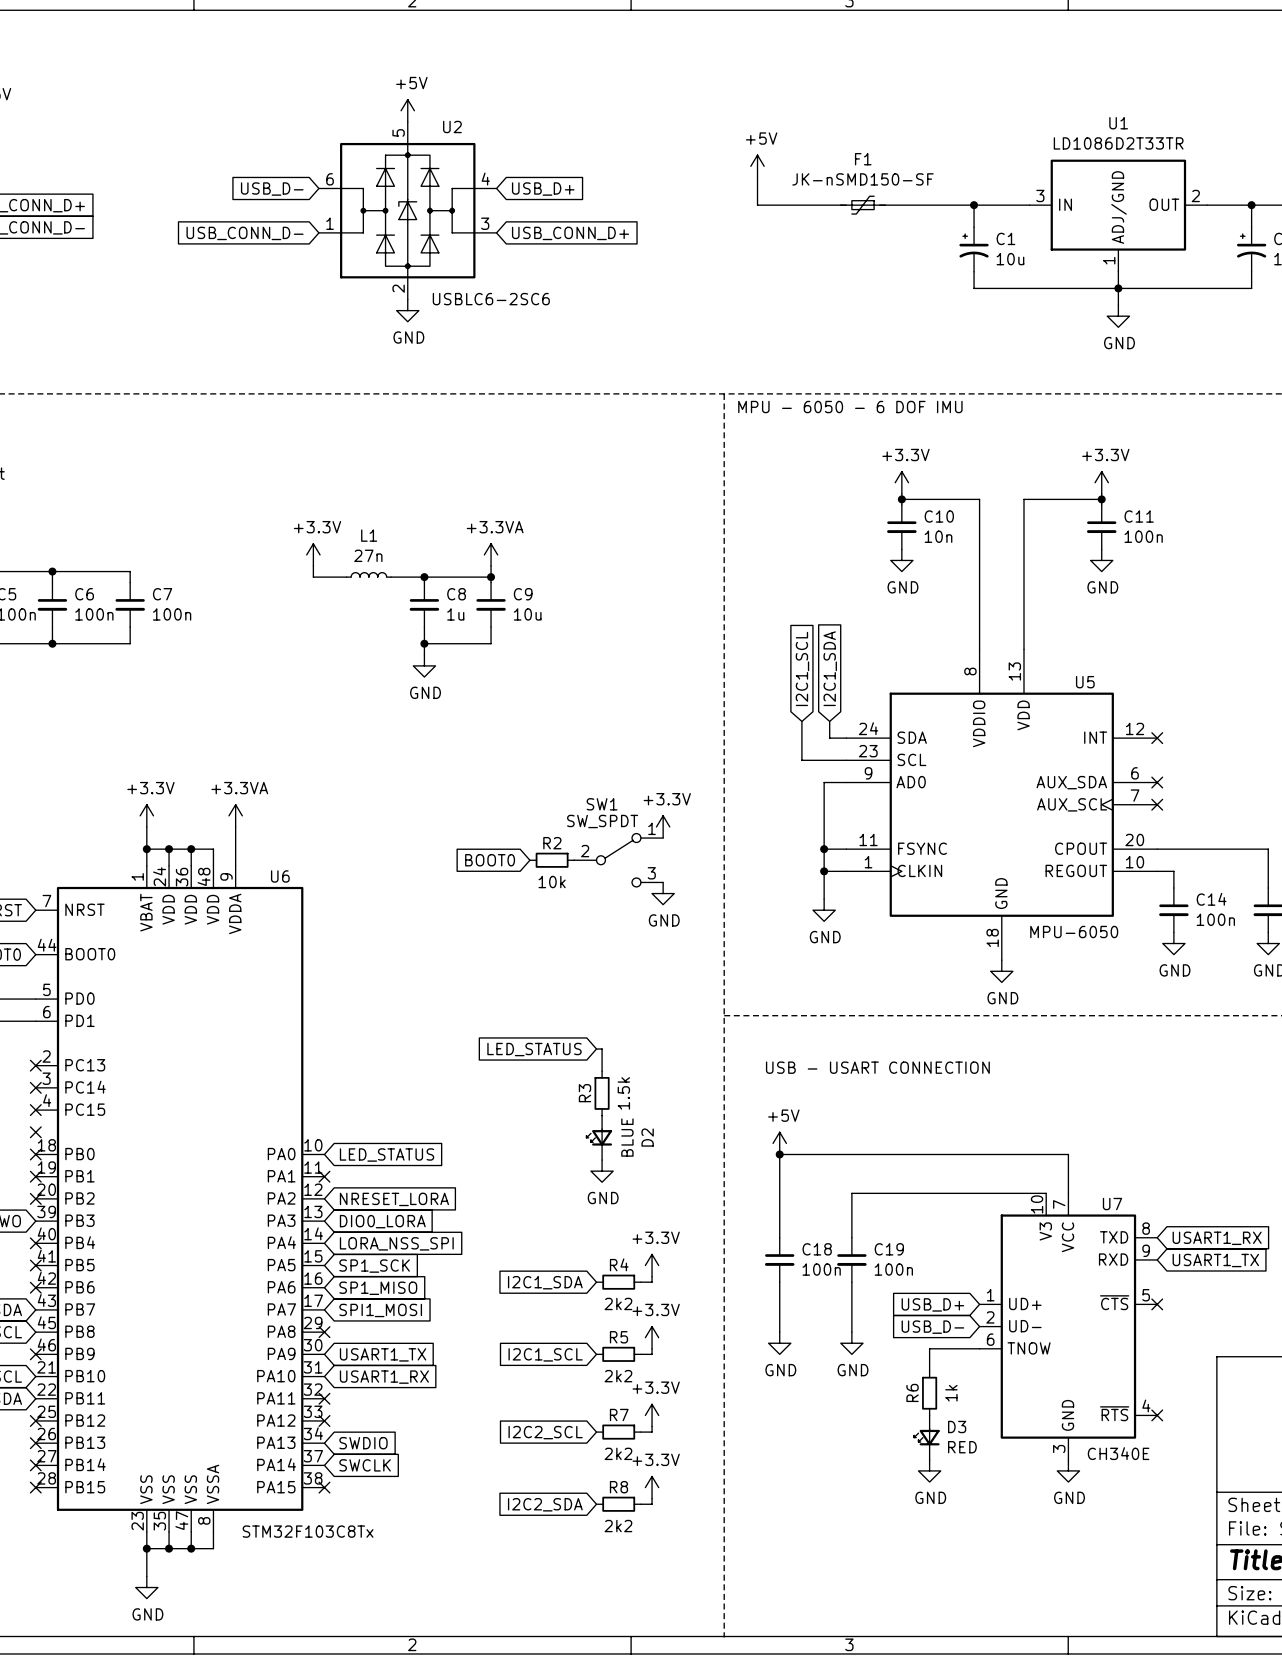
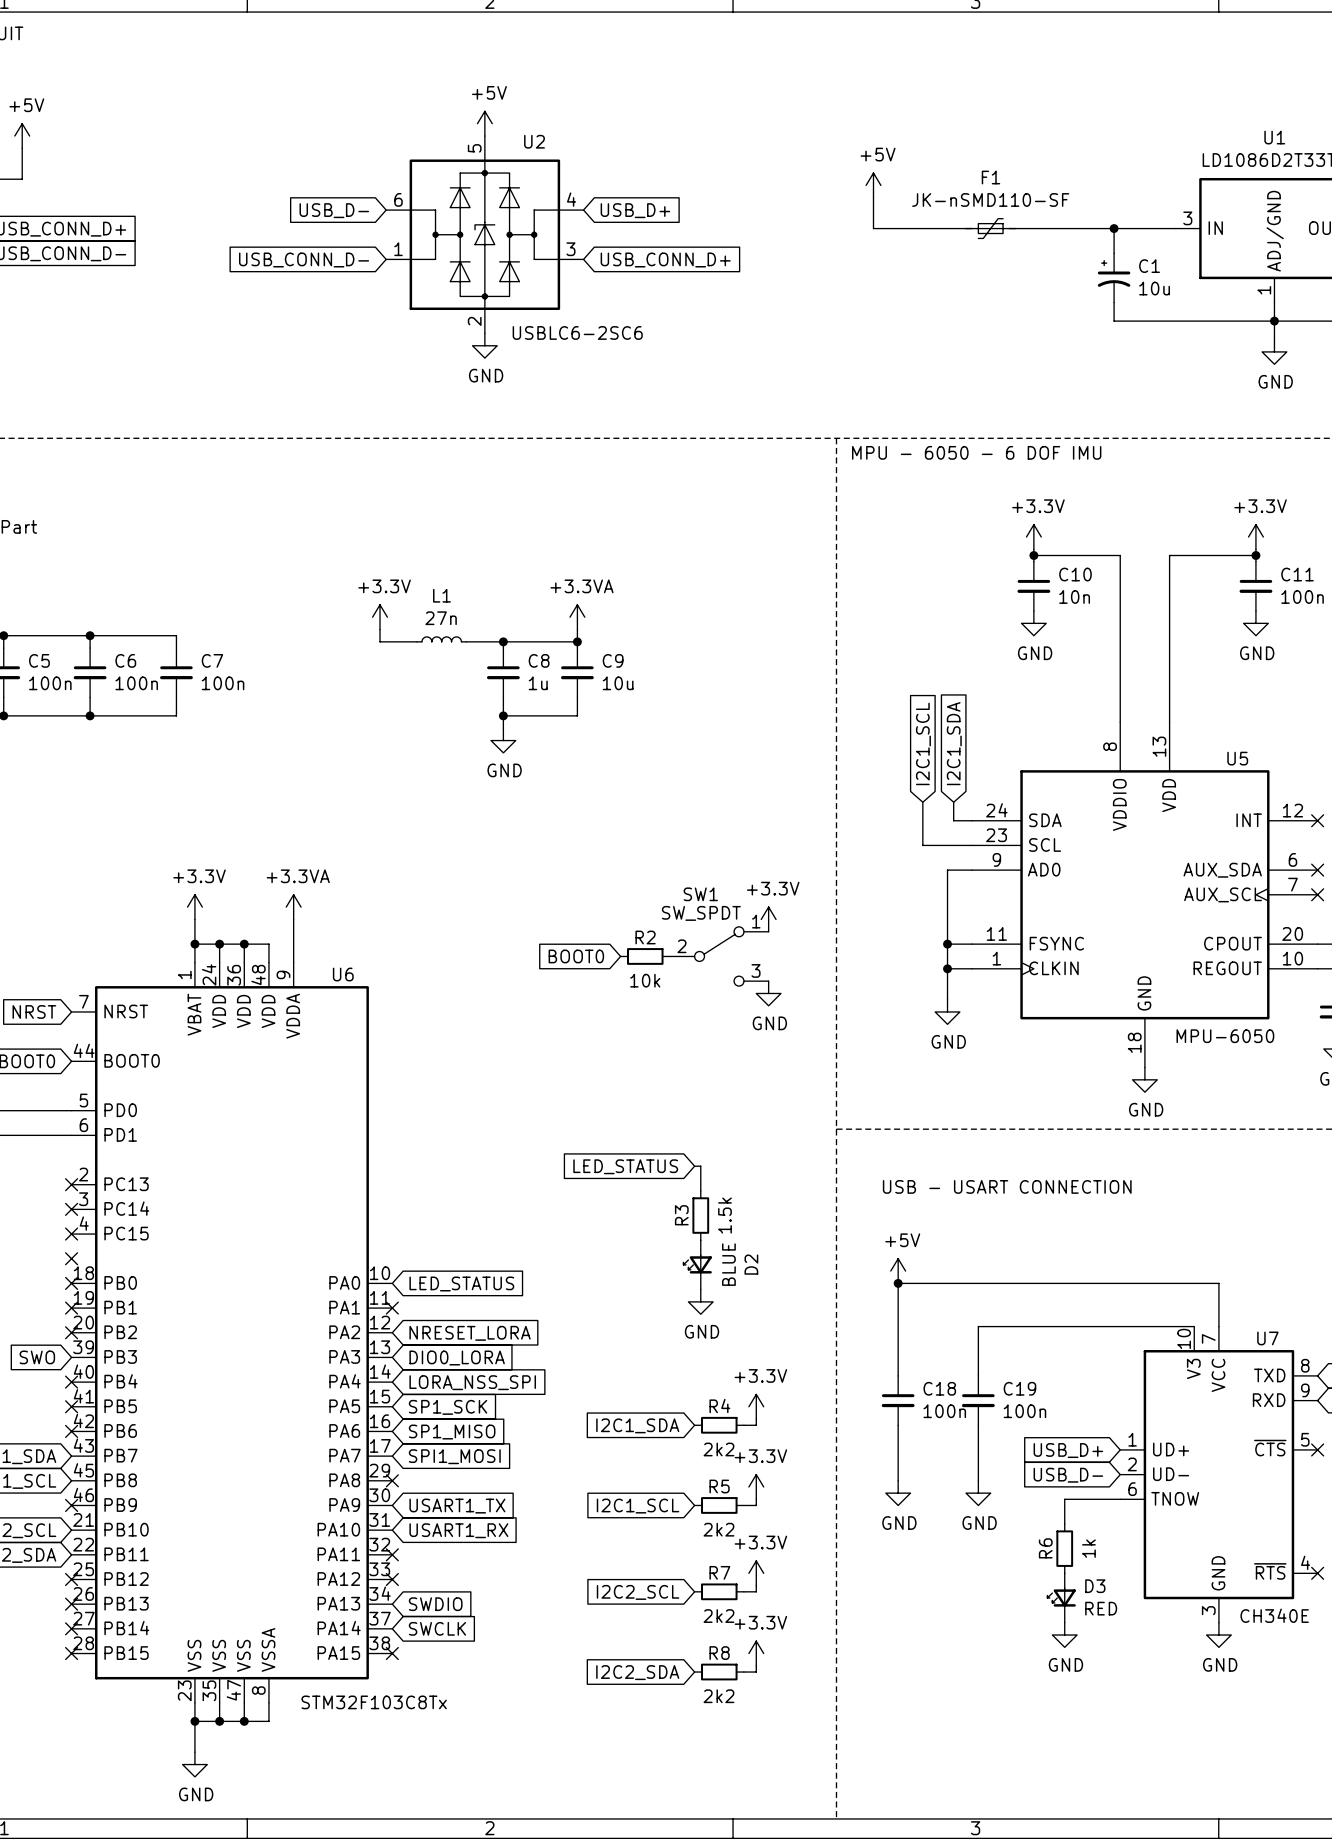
F1 value: JK-nSMD150-SF (862, 179) -> JK-nSMD110-SF (990, 199)

